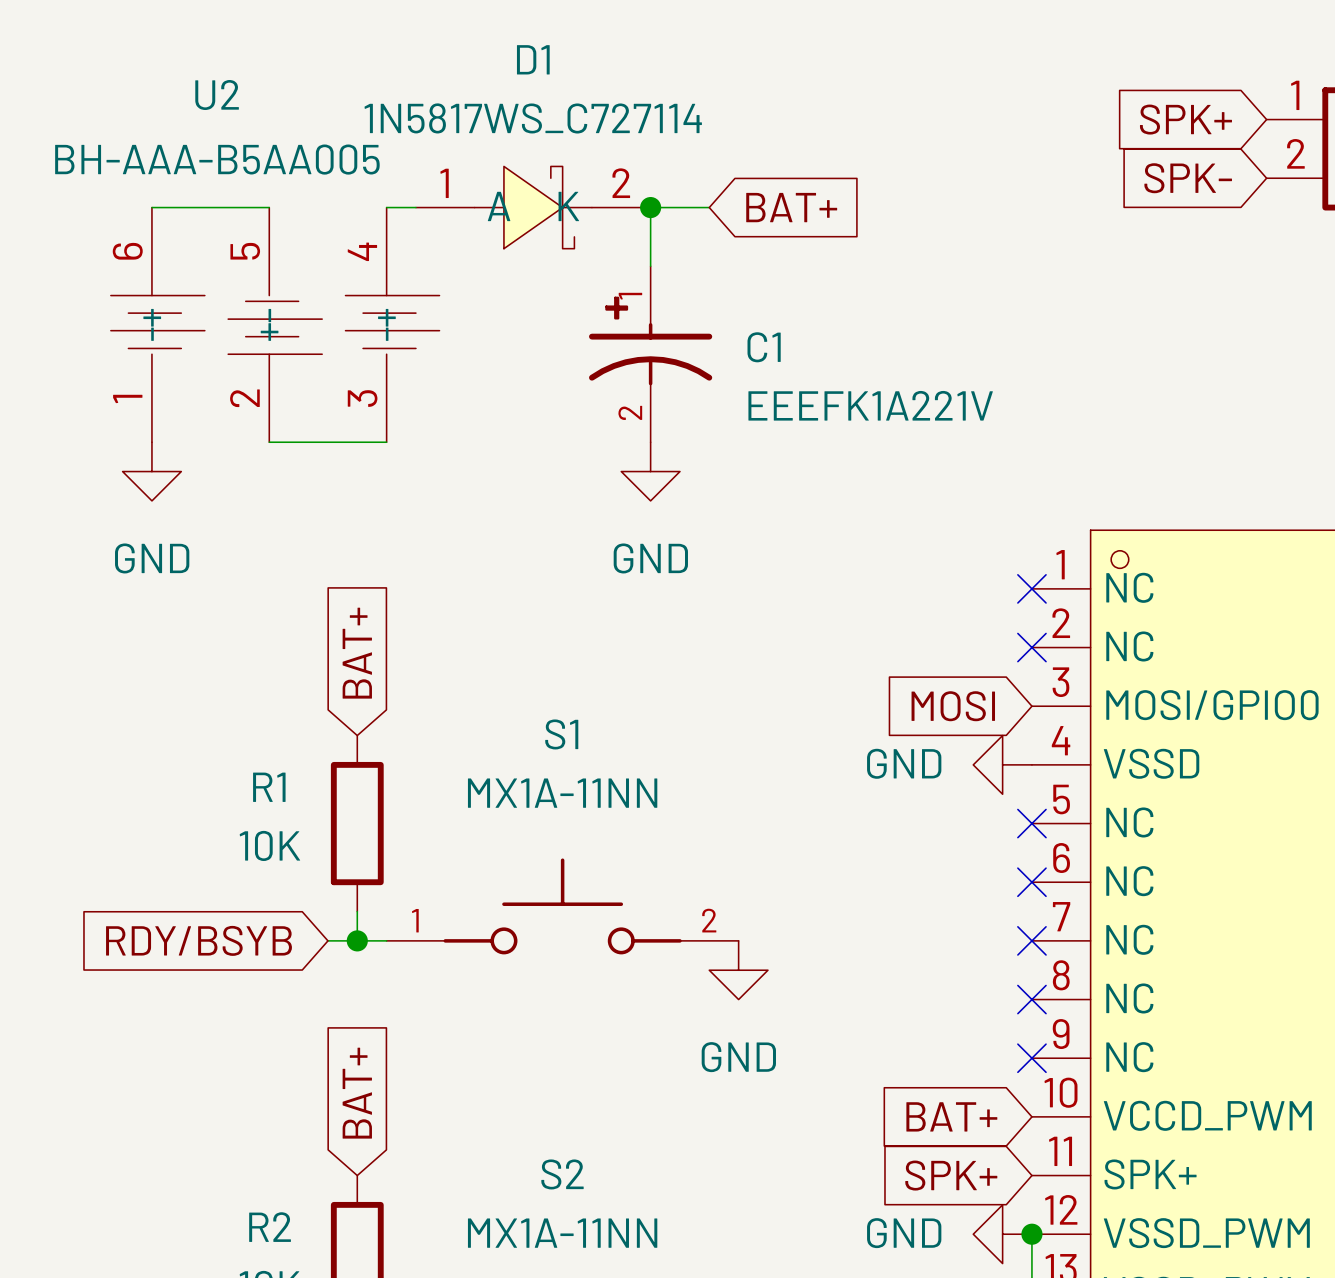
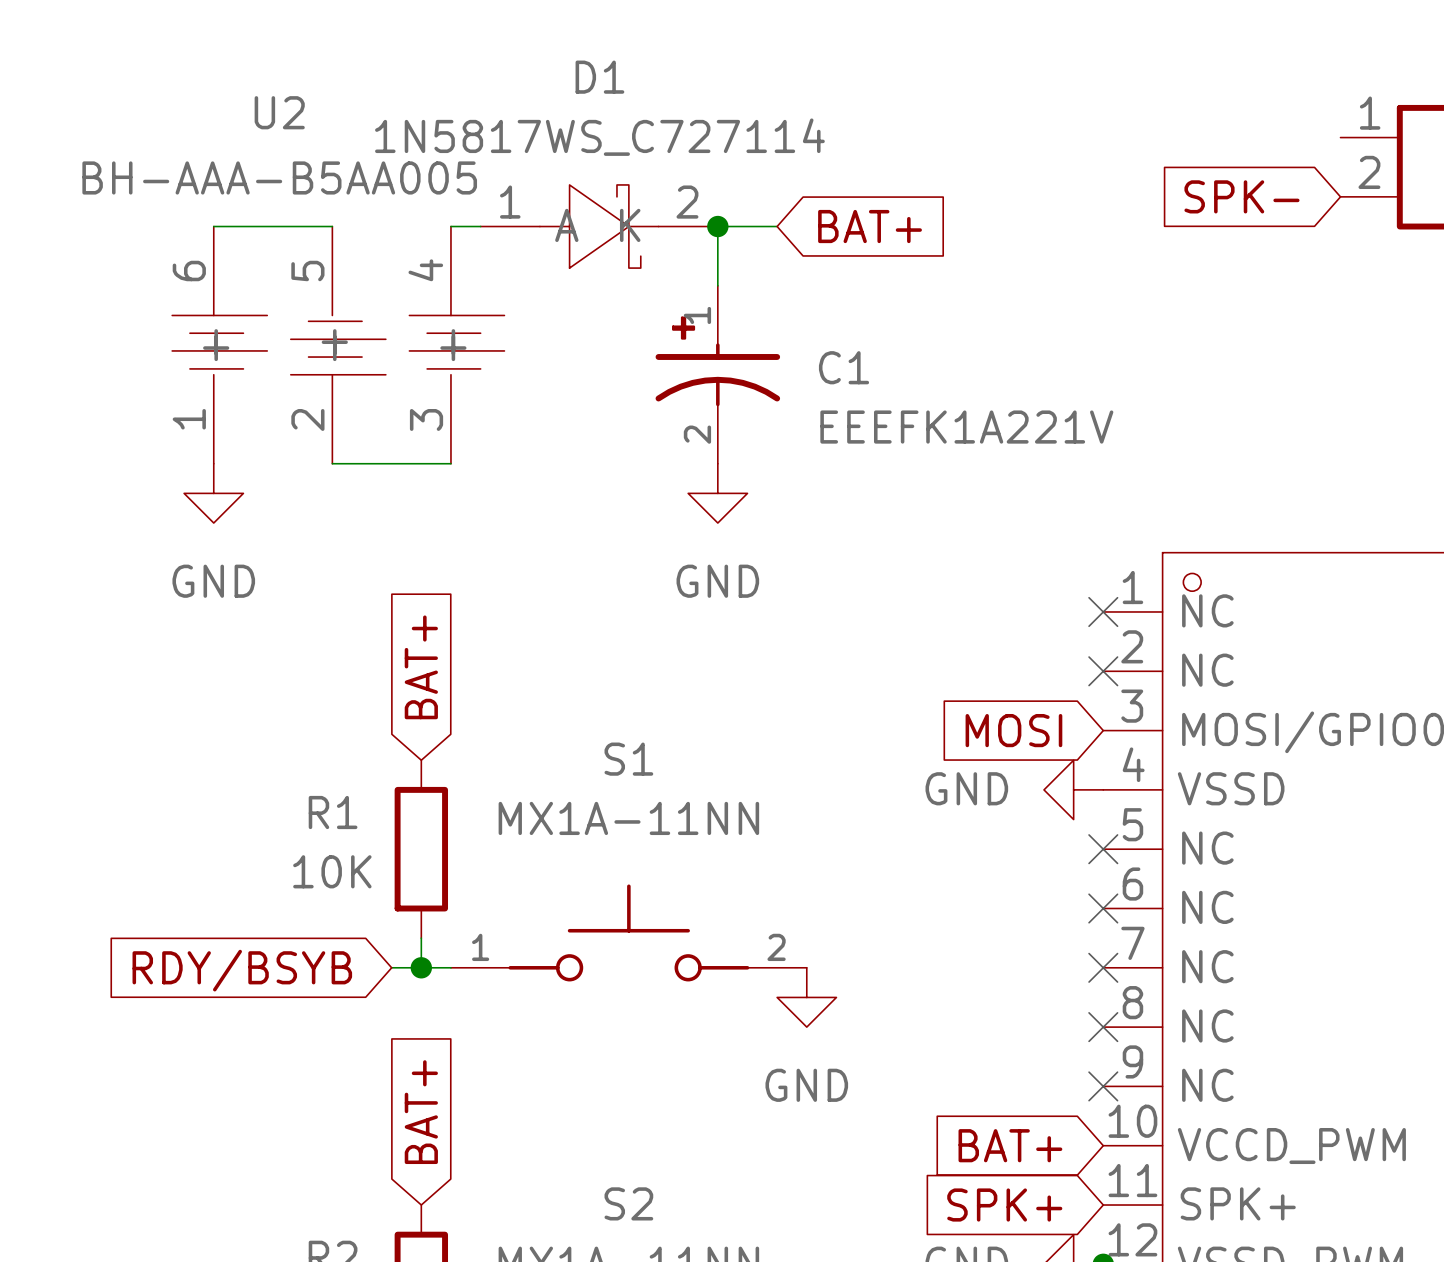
global label: SPK+ (1185, 119) -> none

